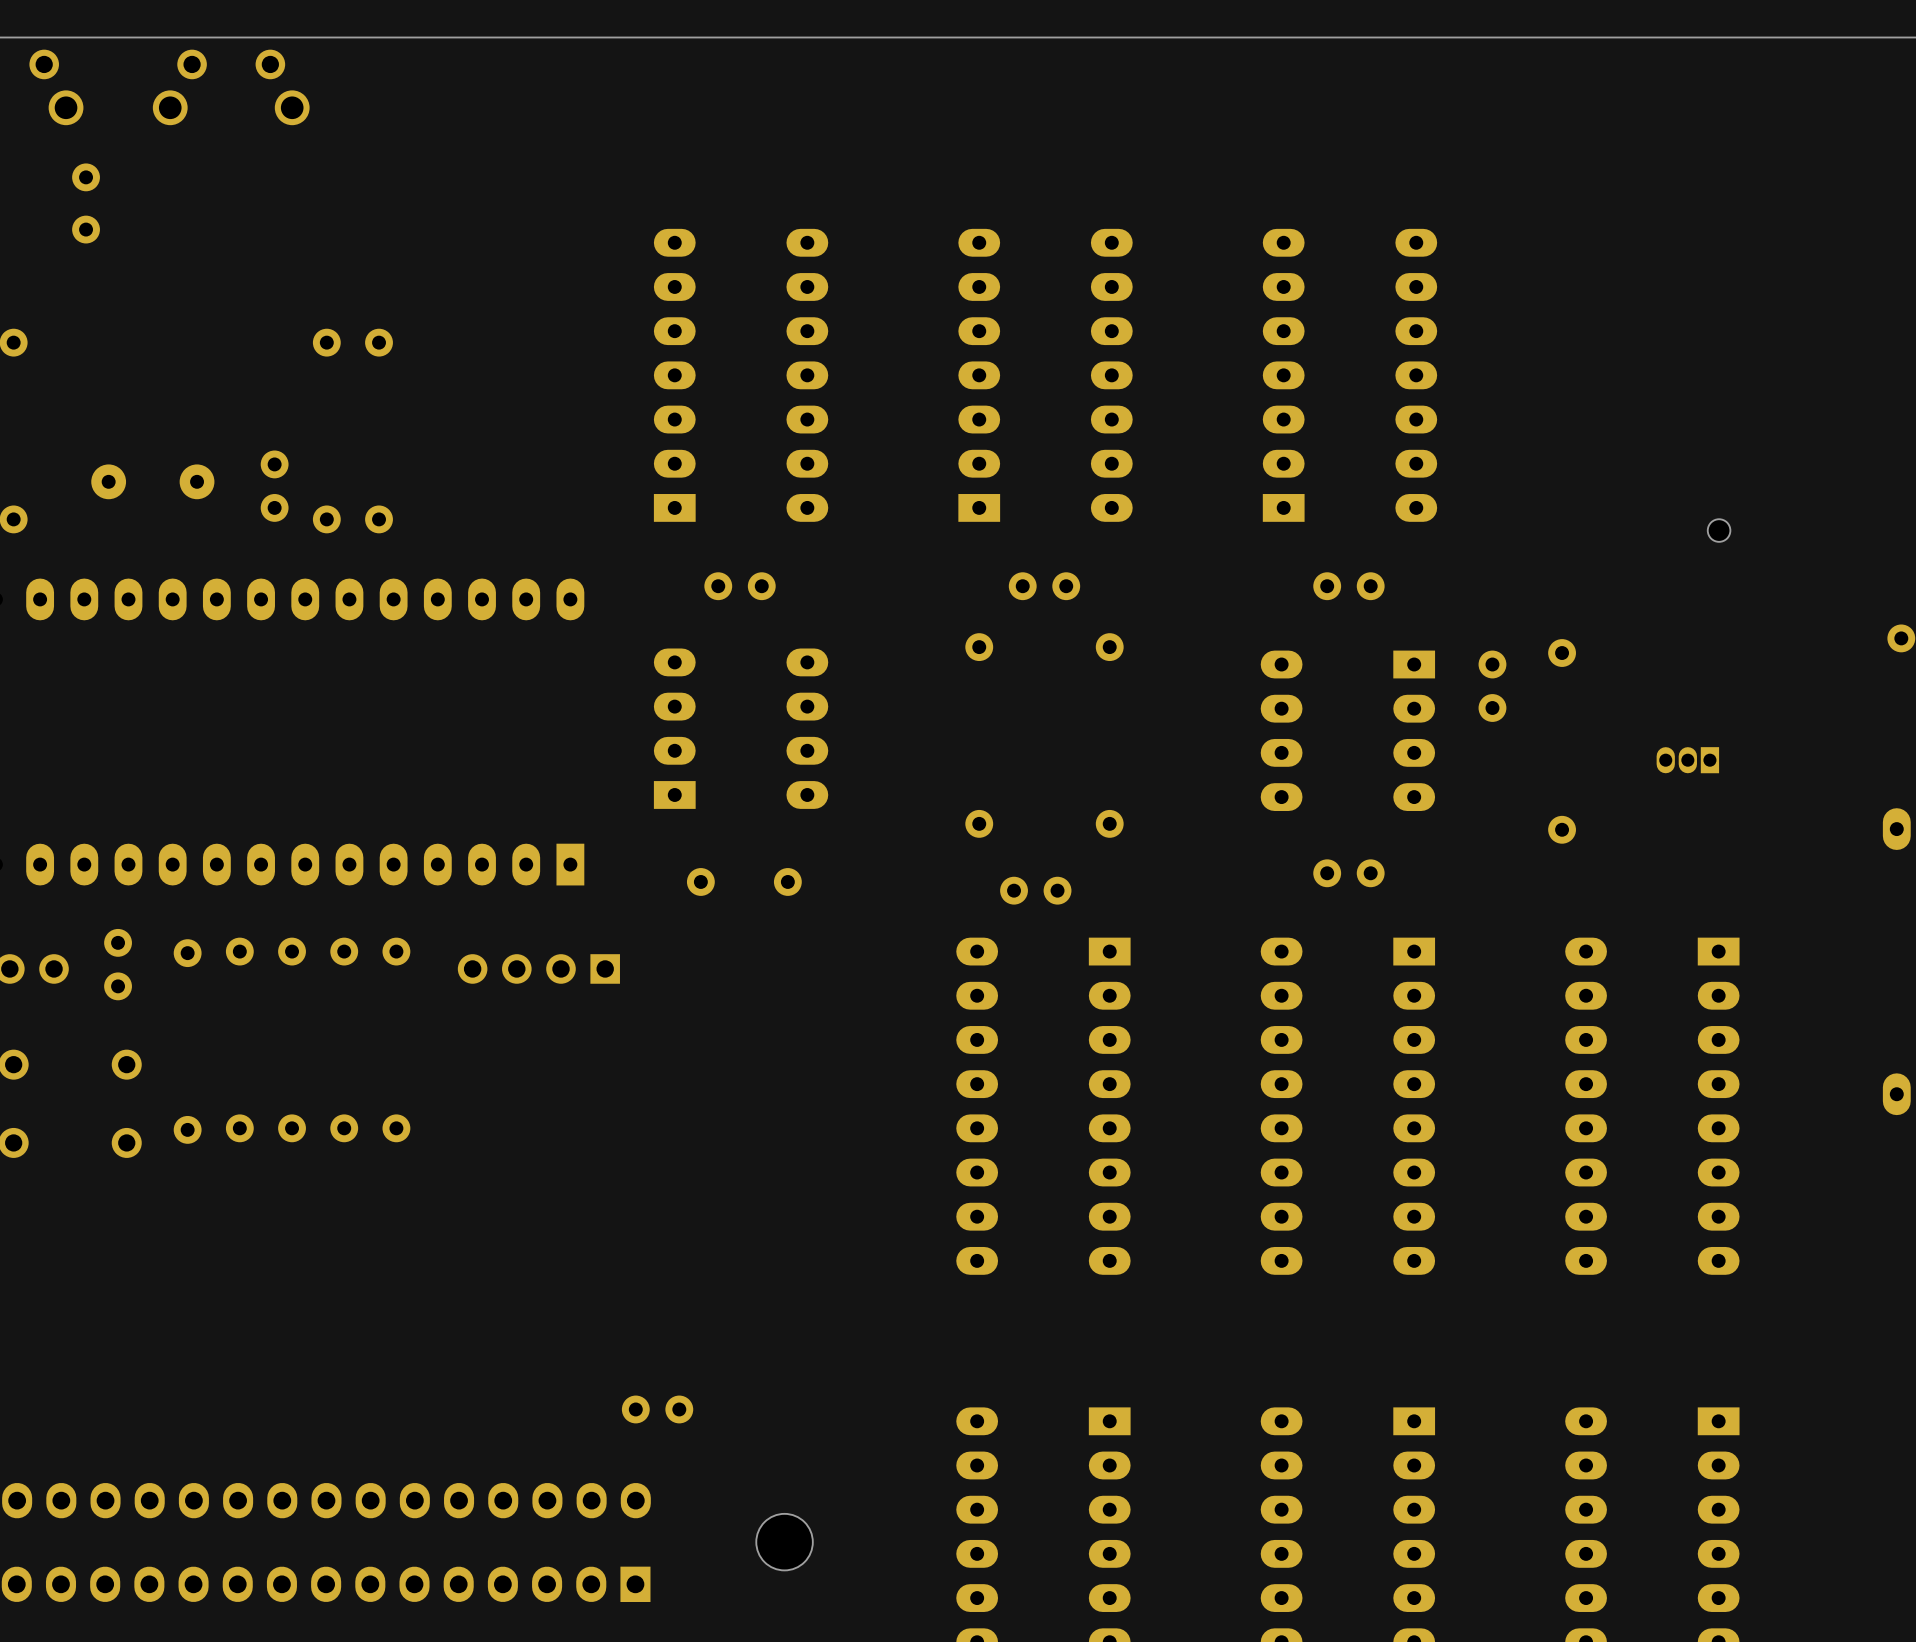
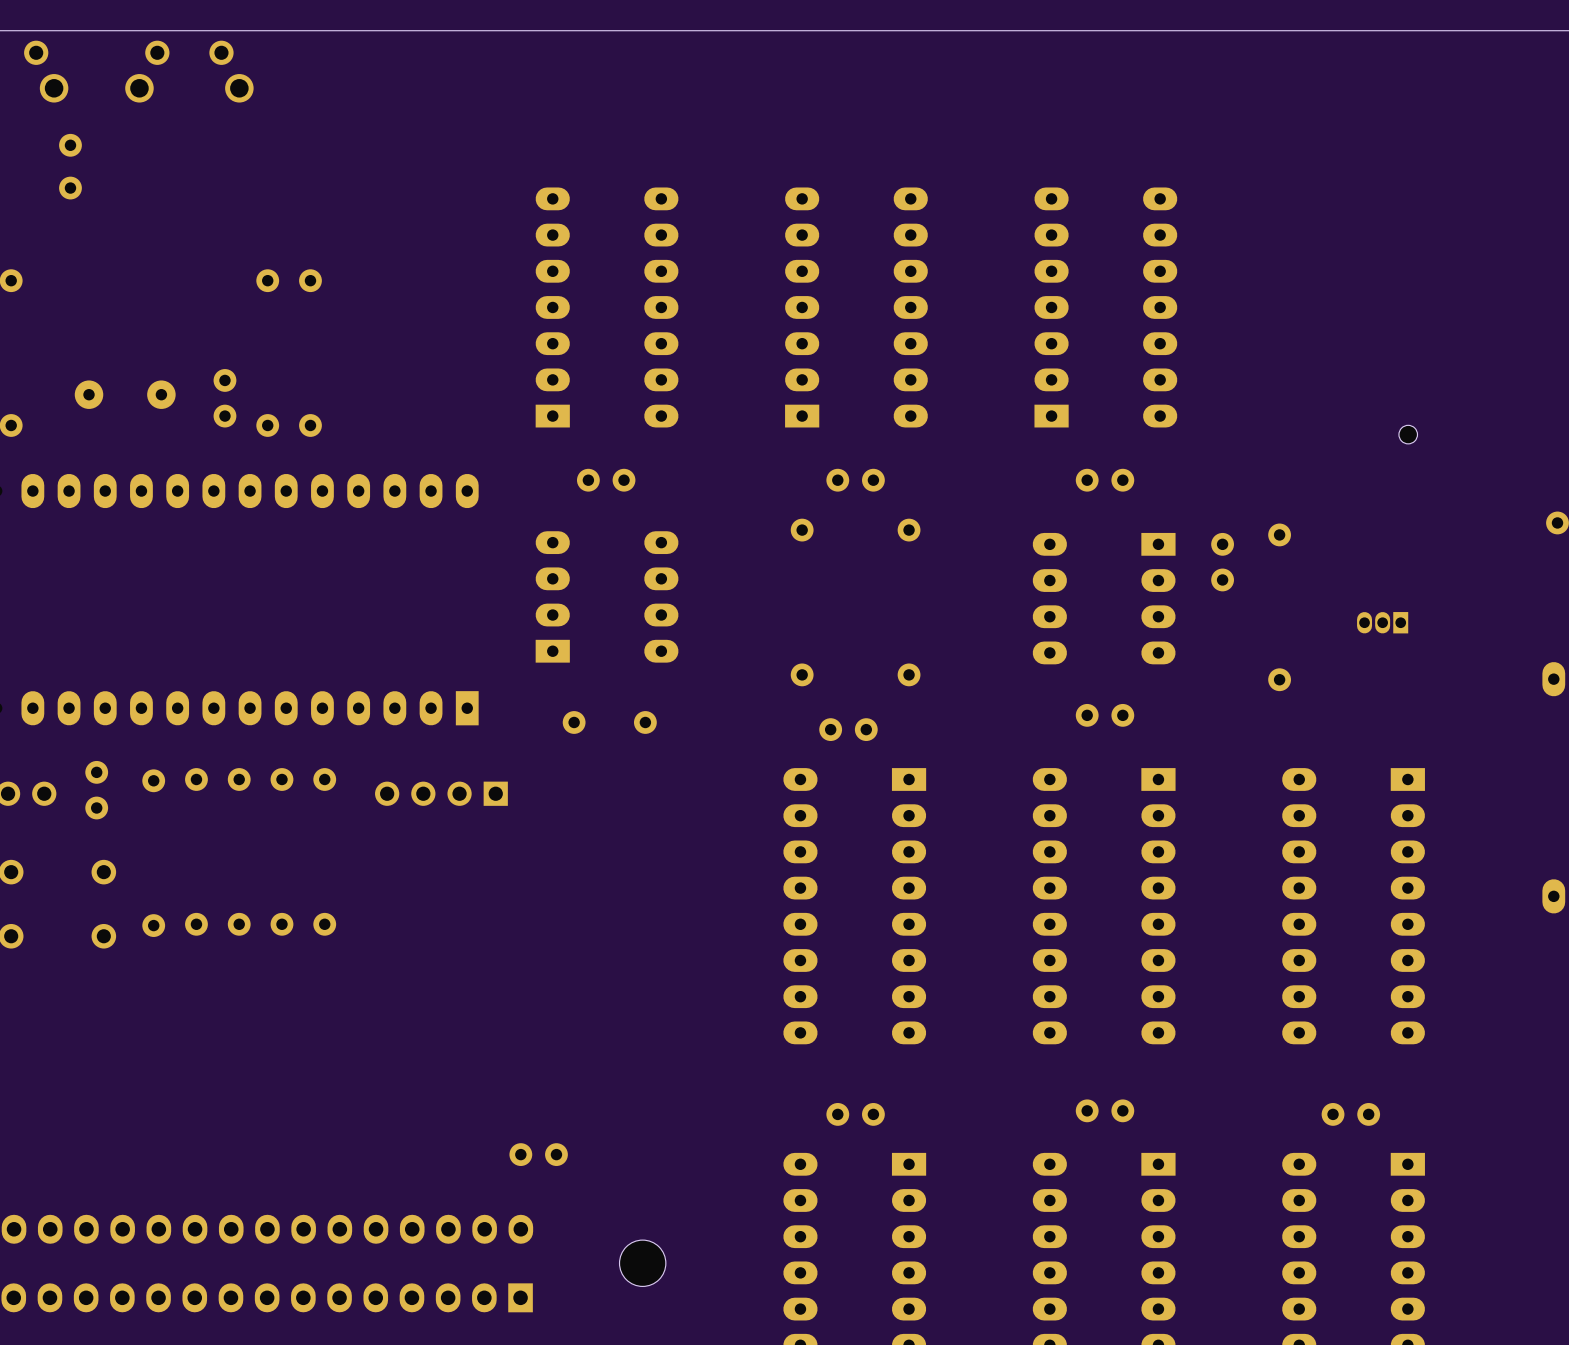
part: none -> (1105, 1110)
part: none -> (855, 1114)
part: none -> (1350, 1114)

